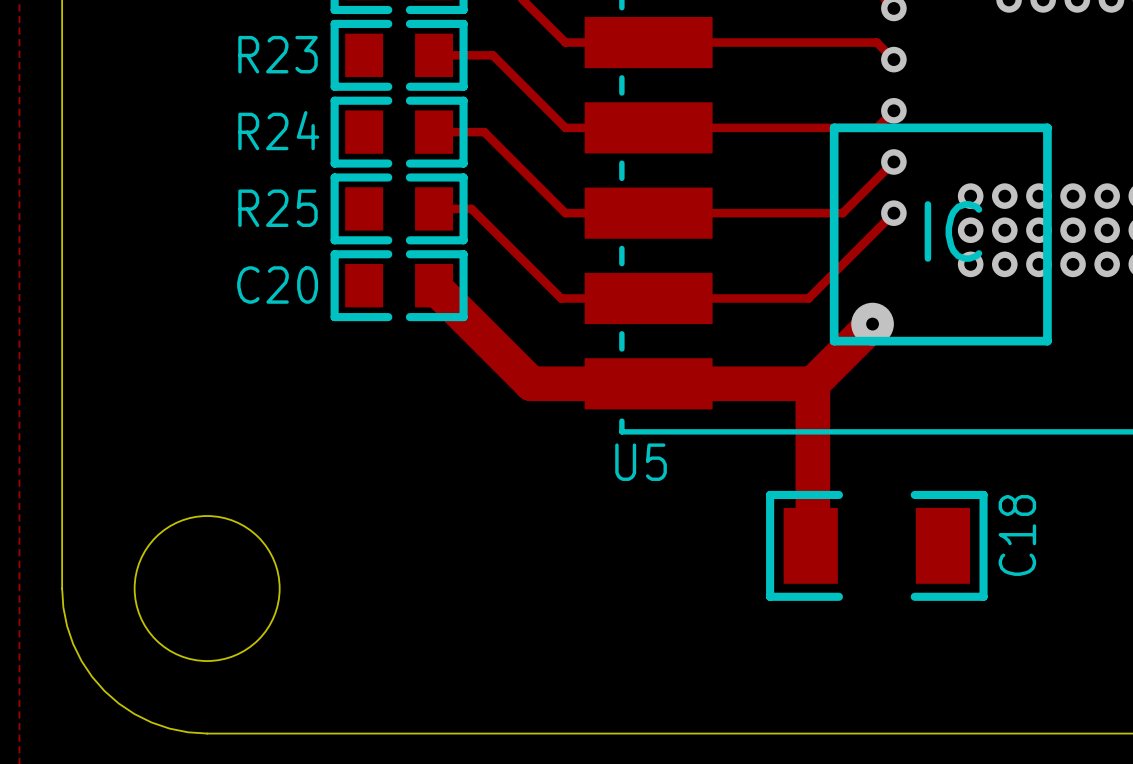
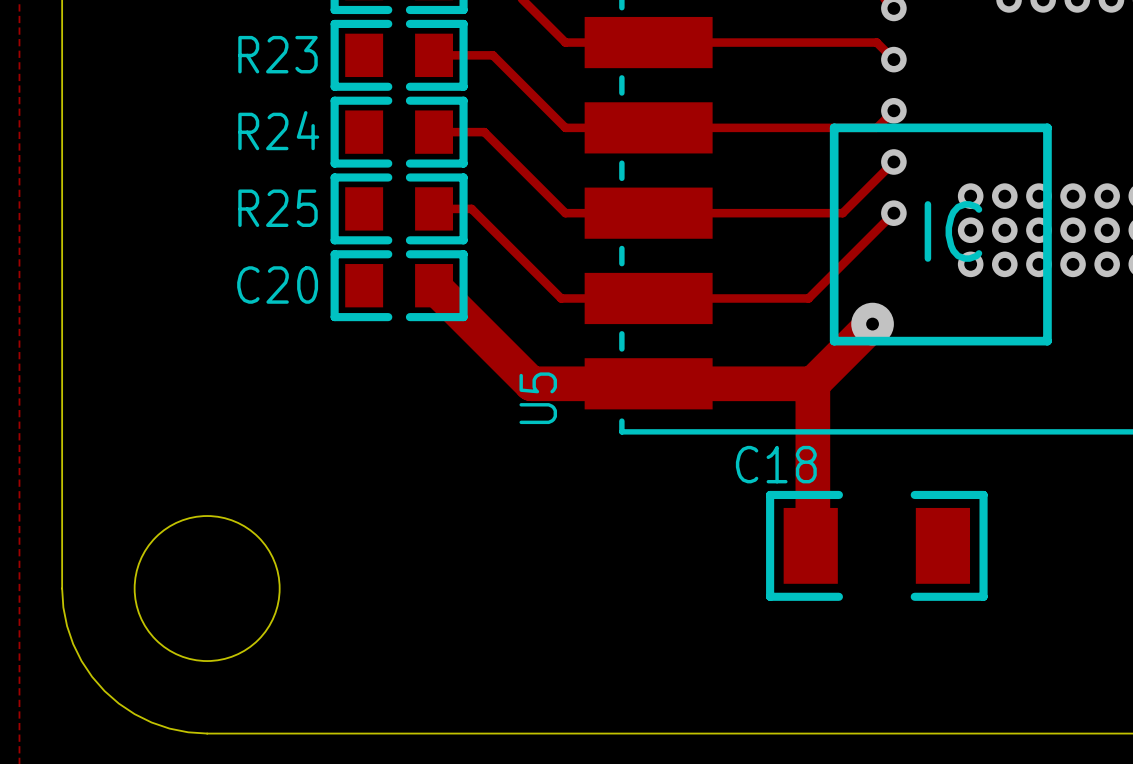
U5 name rotation: 0° (641, 462) -> 90° counterclockwise (538, 398)
U5 name position: U5 (641, 462) -> U5 (538, 398)
C18 name rotation: 0° (1017, 535) -> 90° clockwise (776, 464)
C18 name position: C18 (1017, 535) -> C18 (776, 464)

